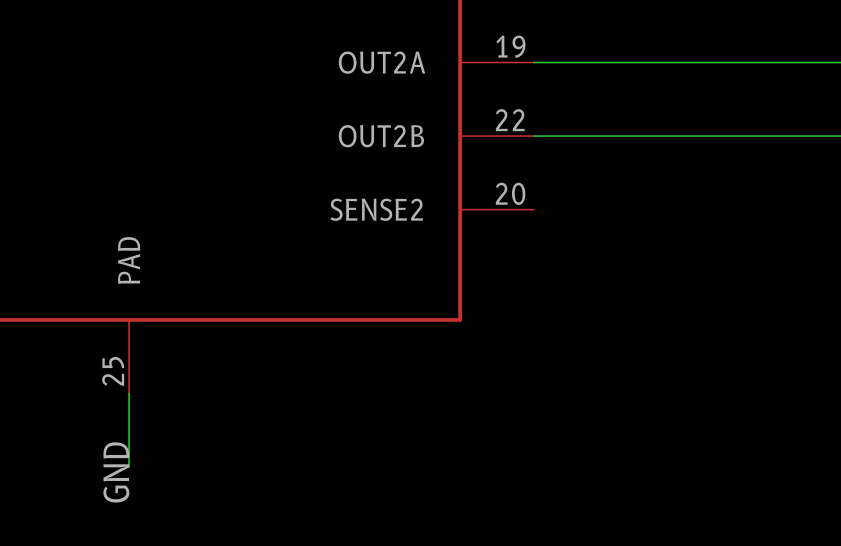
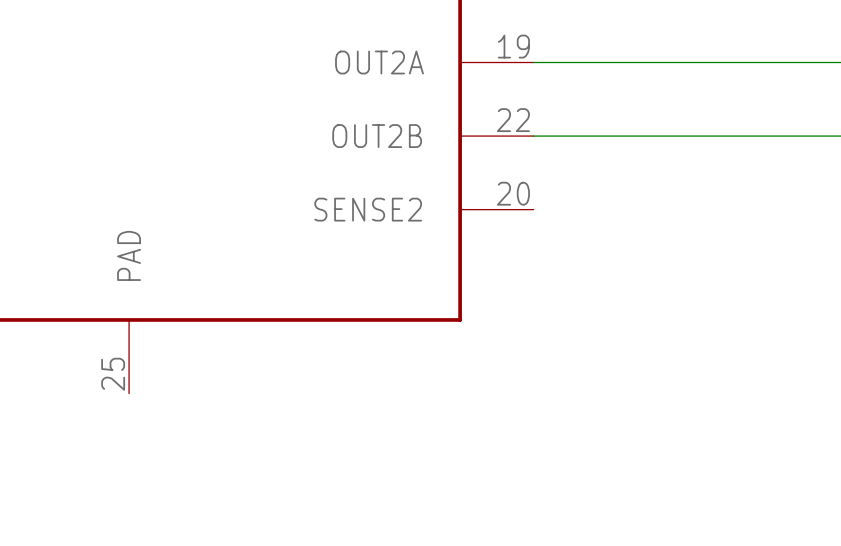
wire: (129, 393) (129, 467) -> none
label: GND (116, 472) -> none

